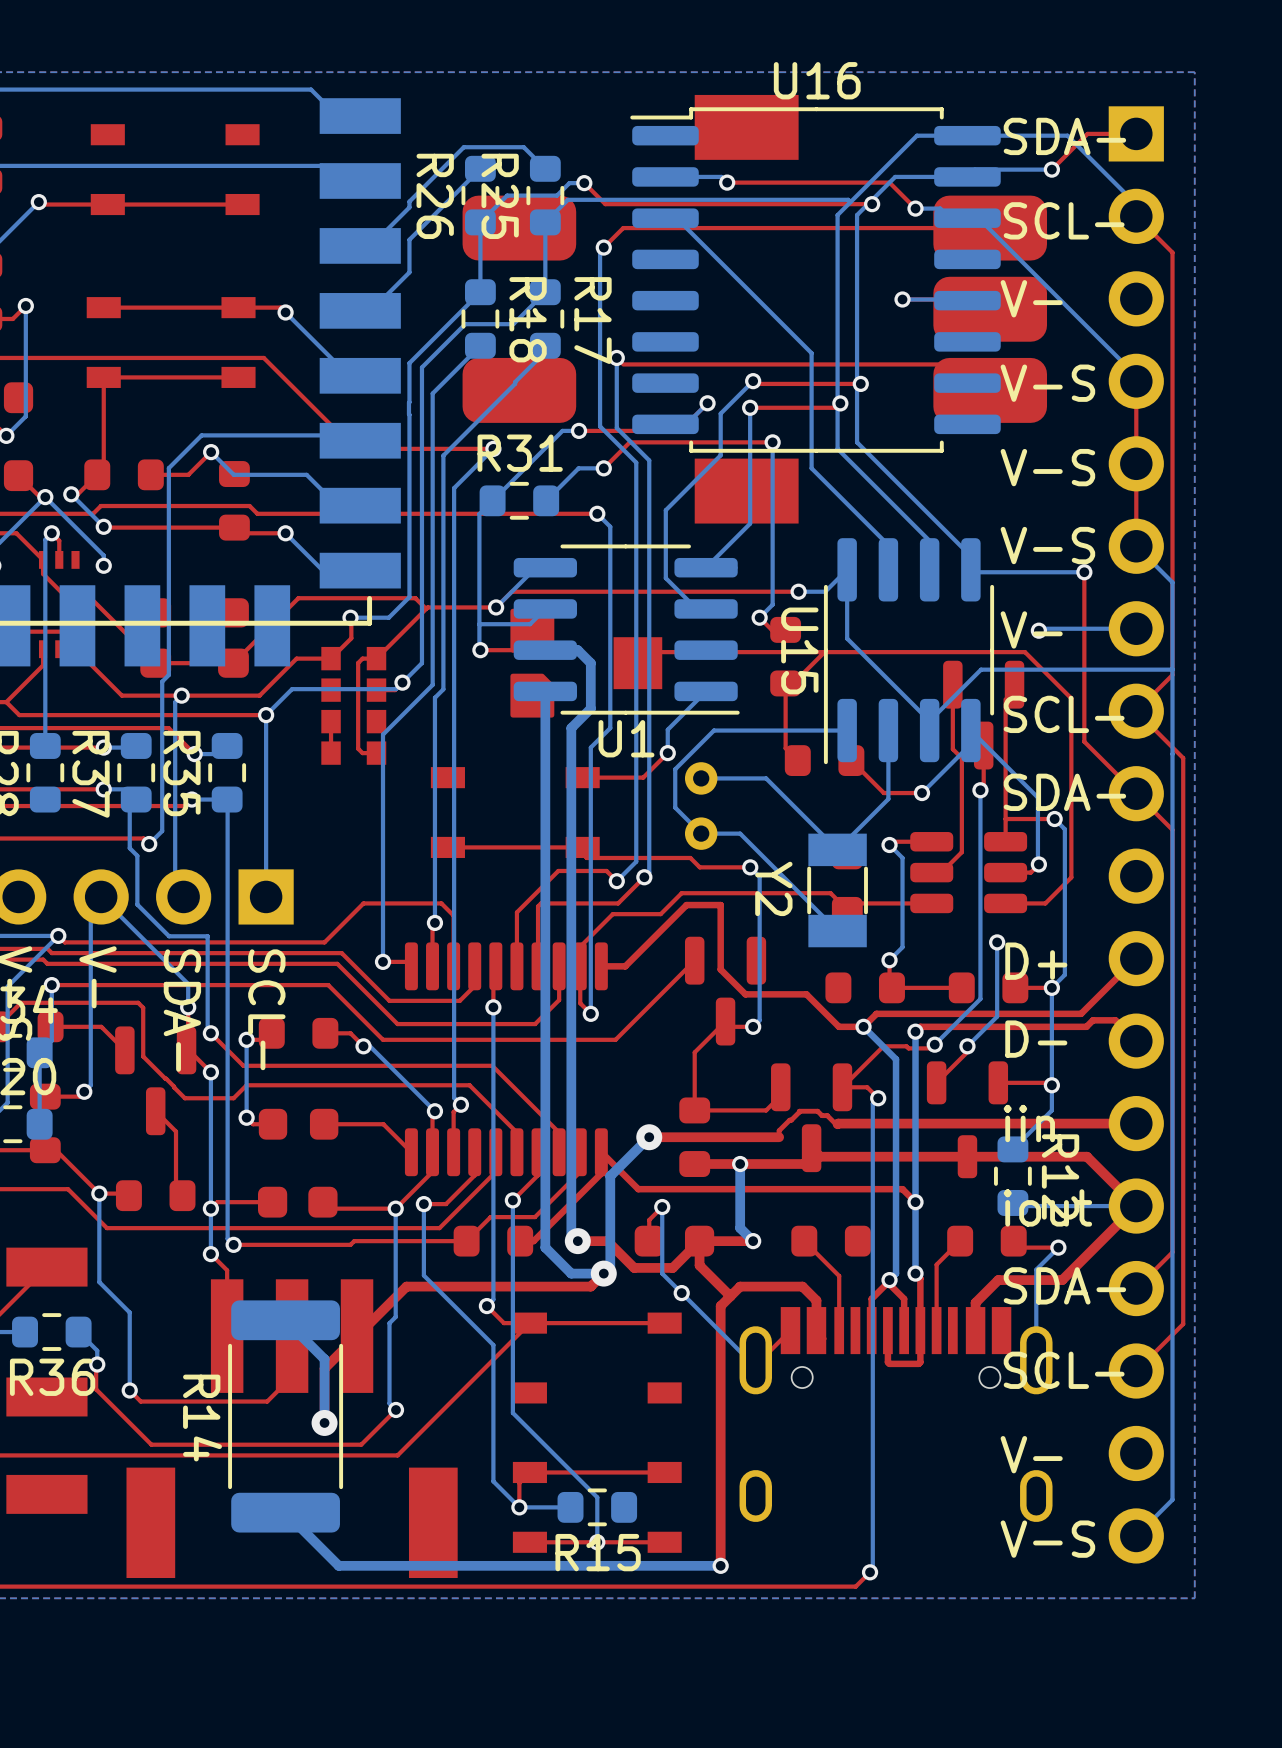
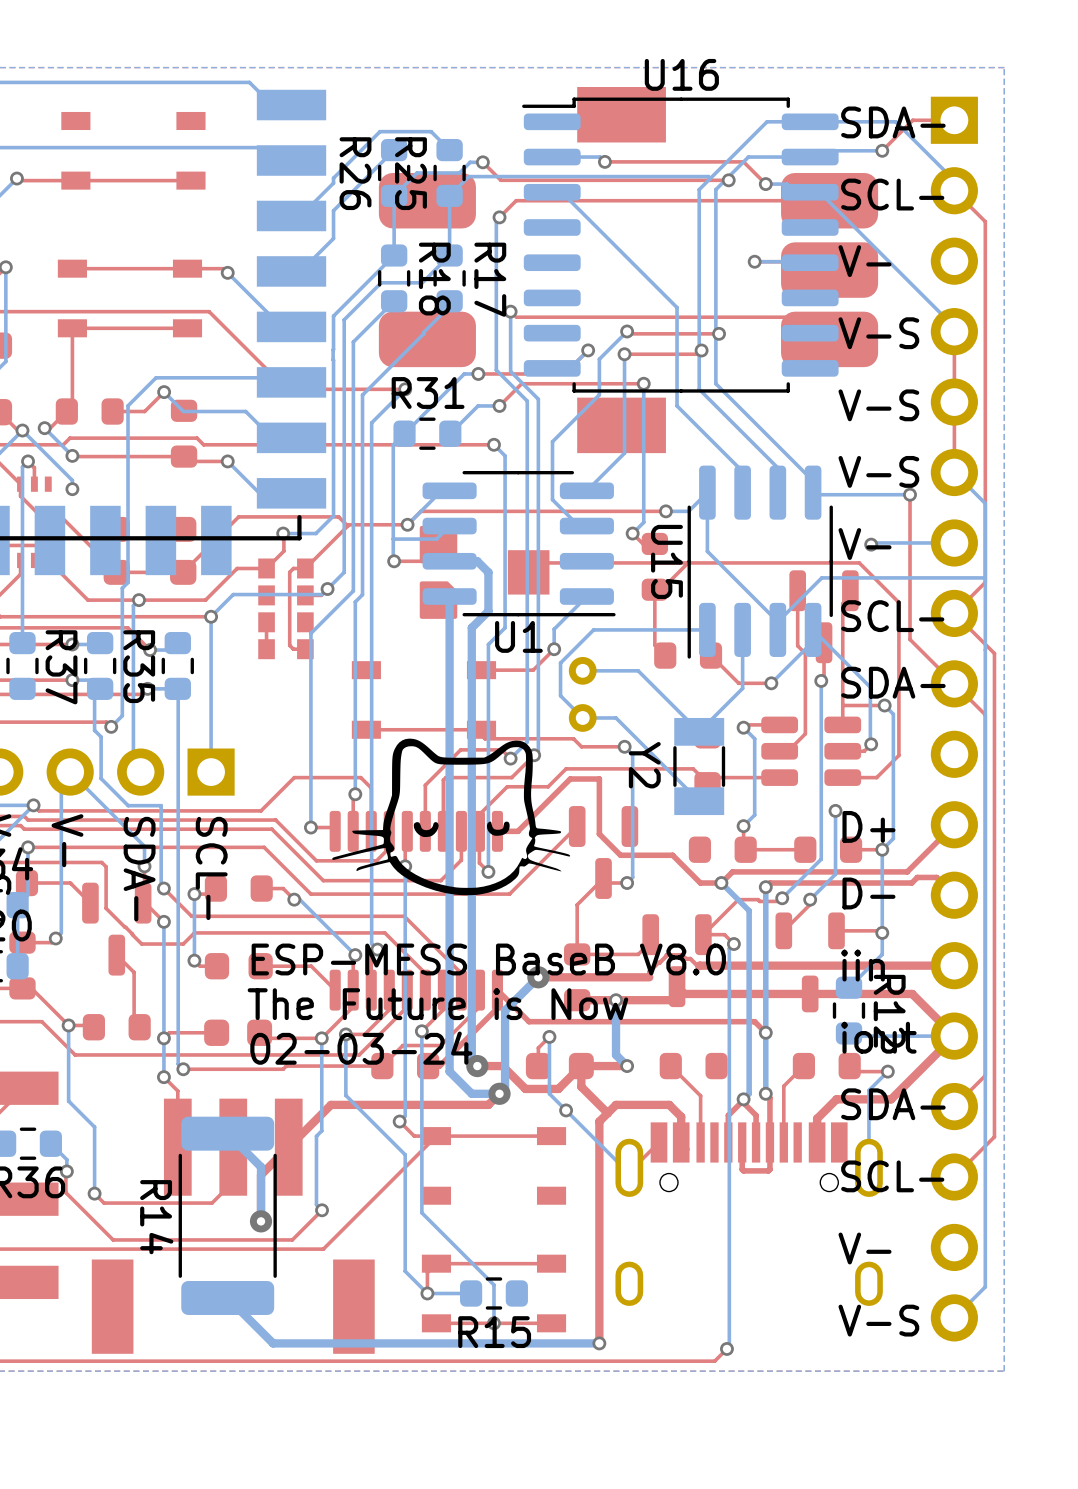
drawing: none -> [332, 738, 571, 896]
text: none -> ESP-MESS BaseB V8.0 (488, 959)
text: none -> The Future is Now (437, 1004)
text: none -> 02-03-24 (361, 1048)

